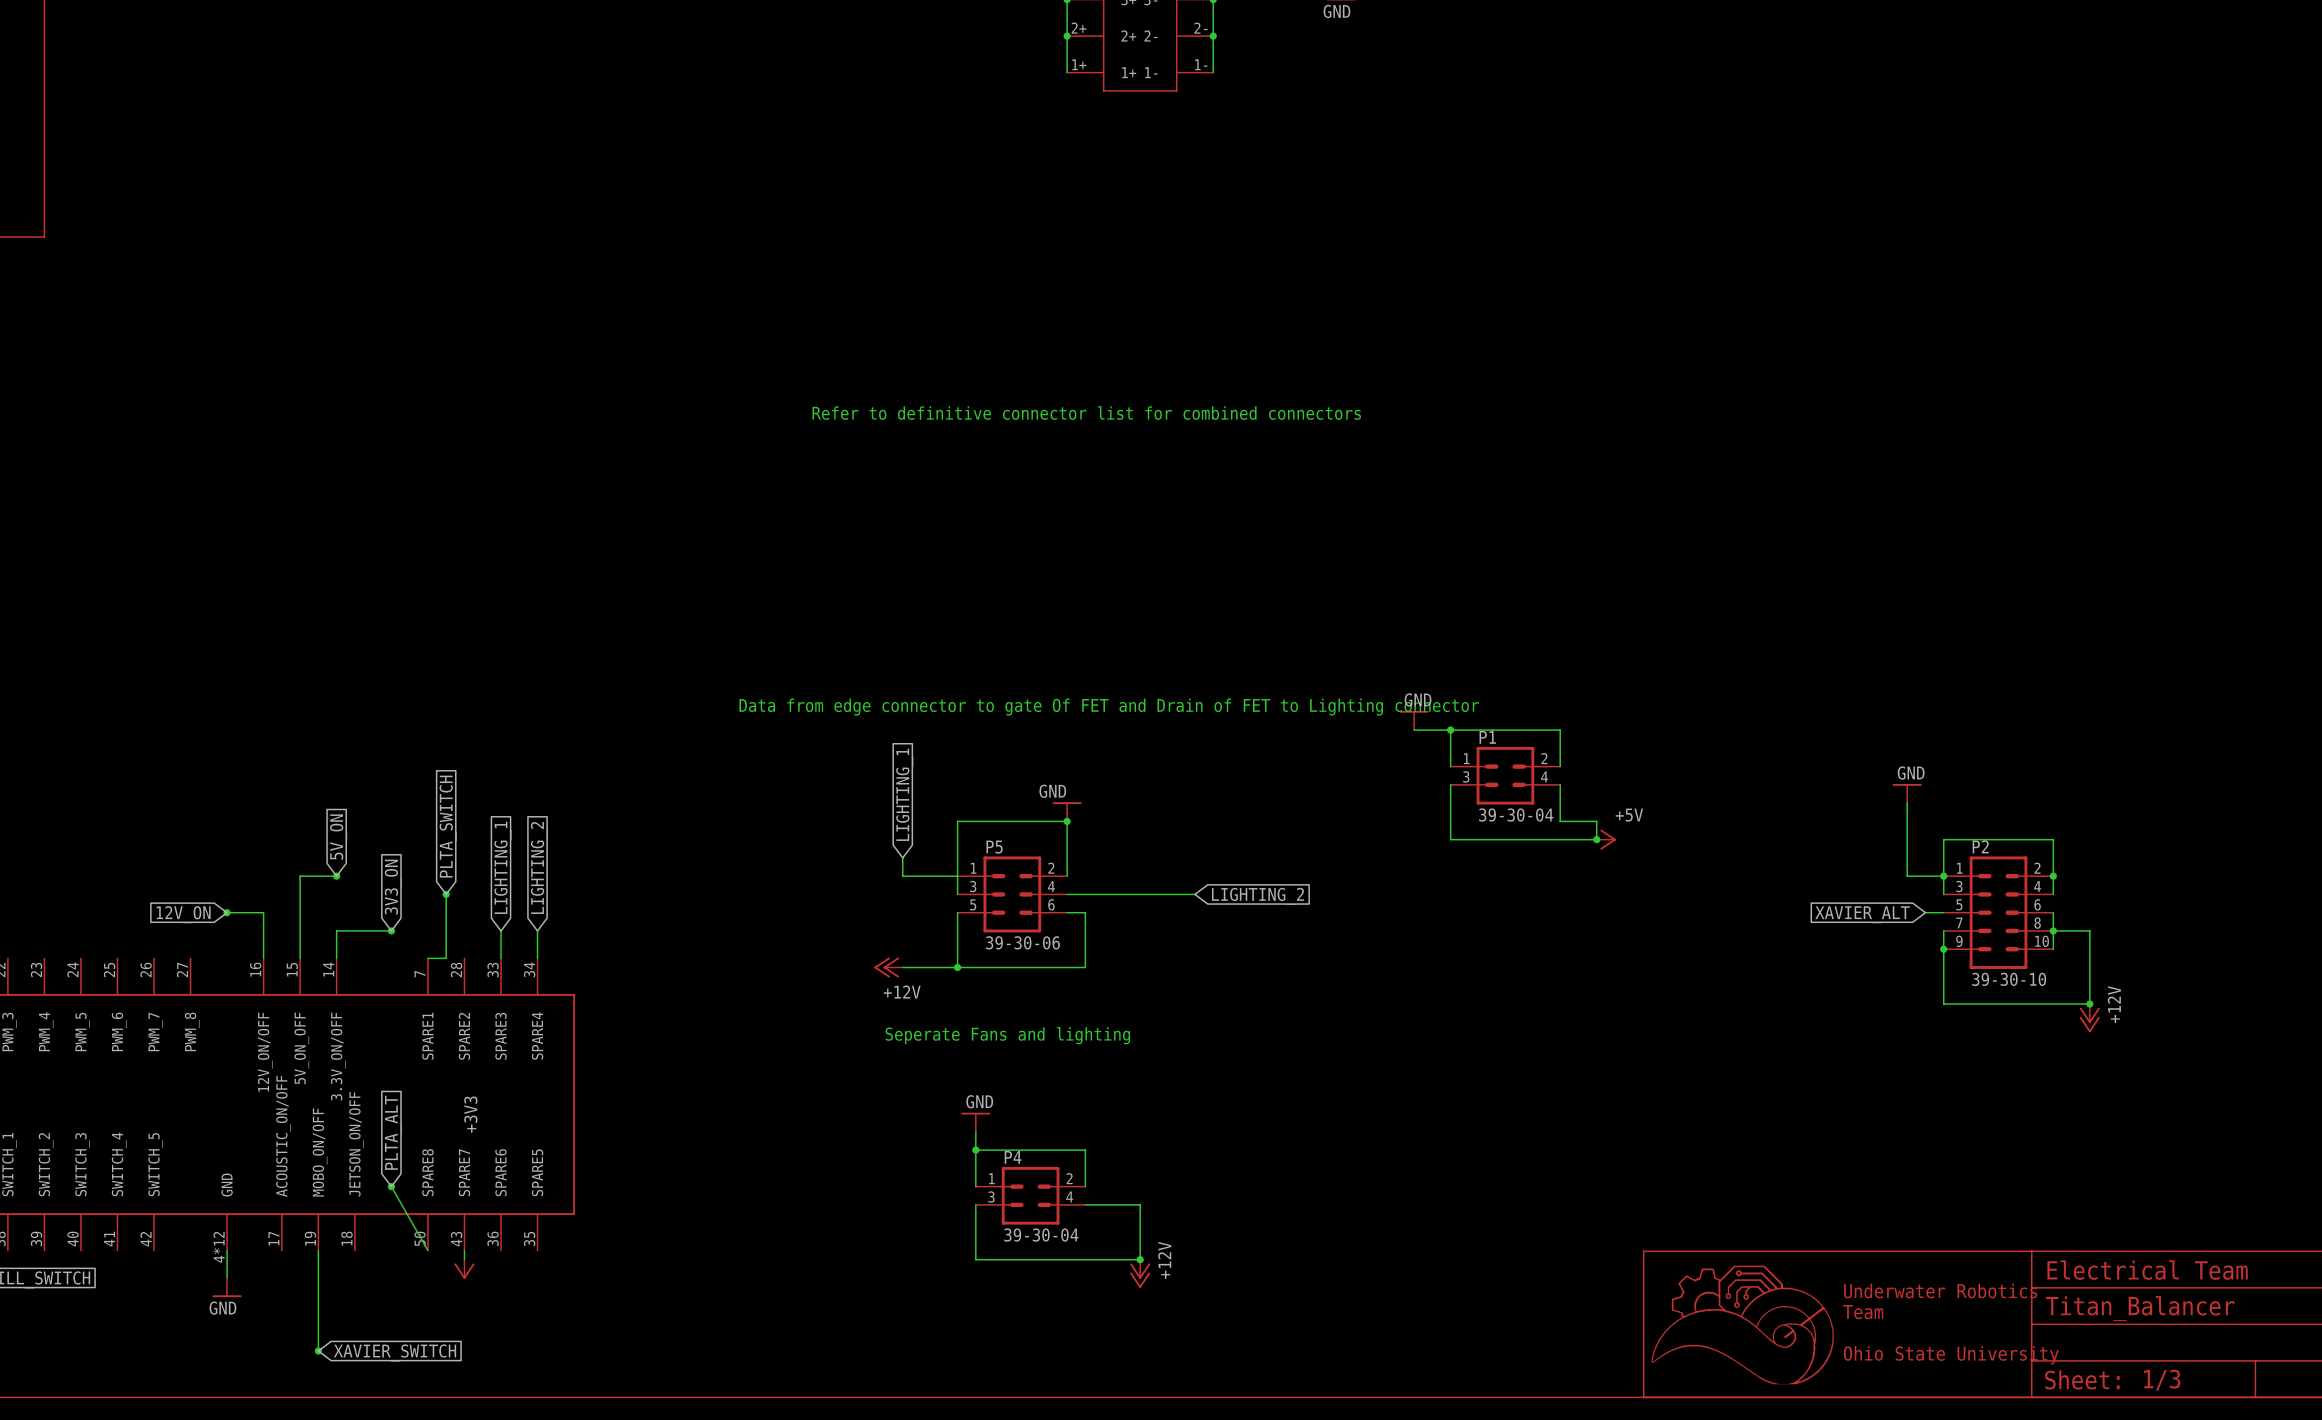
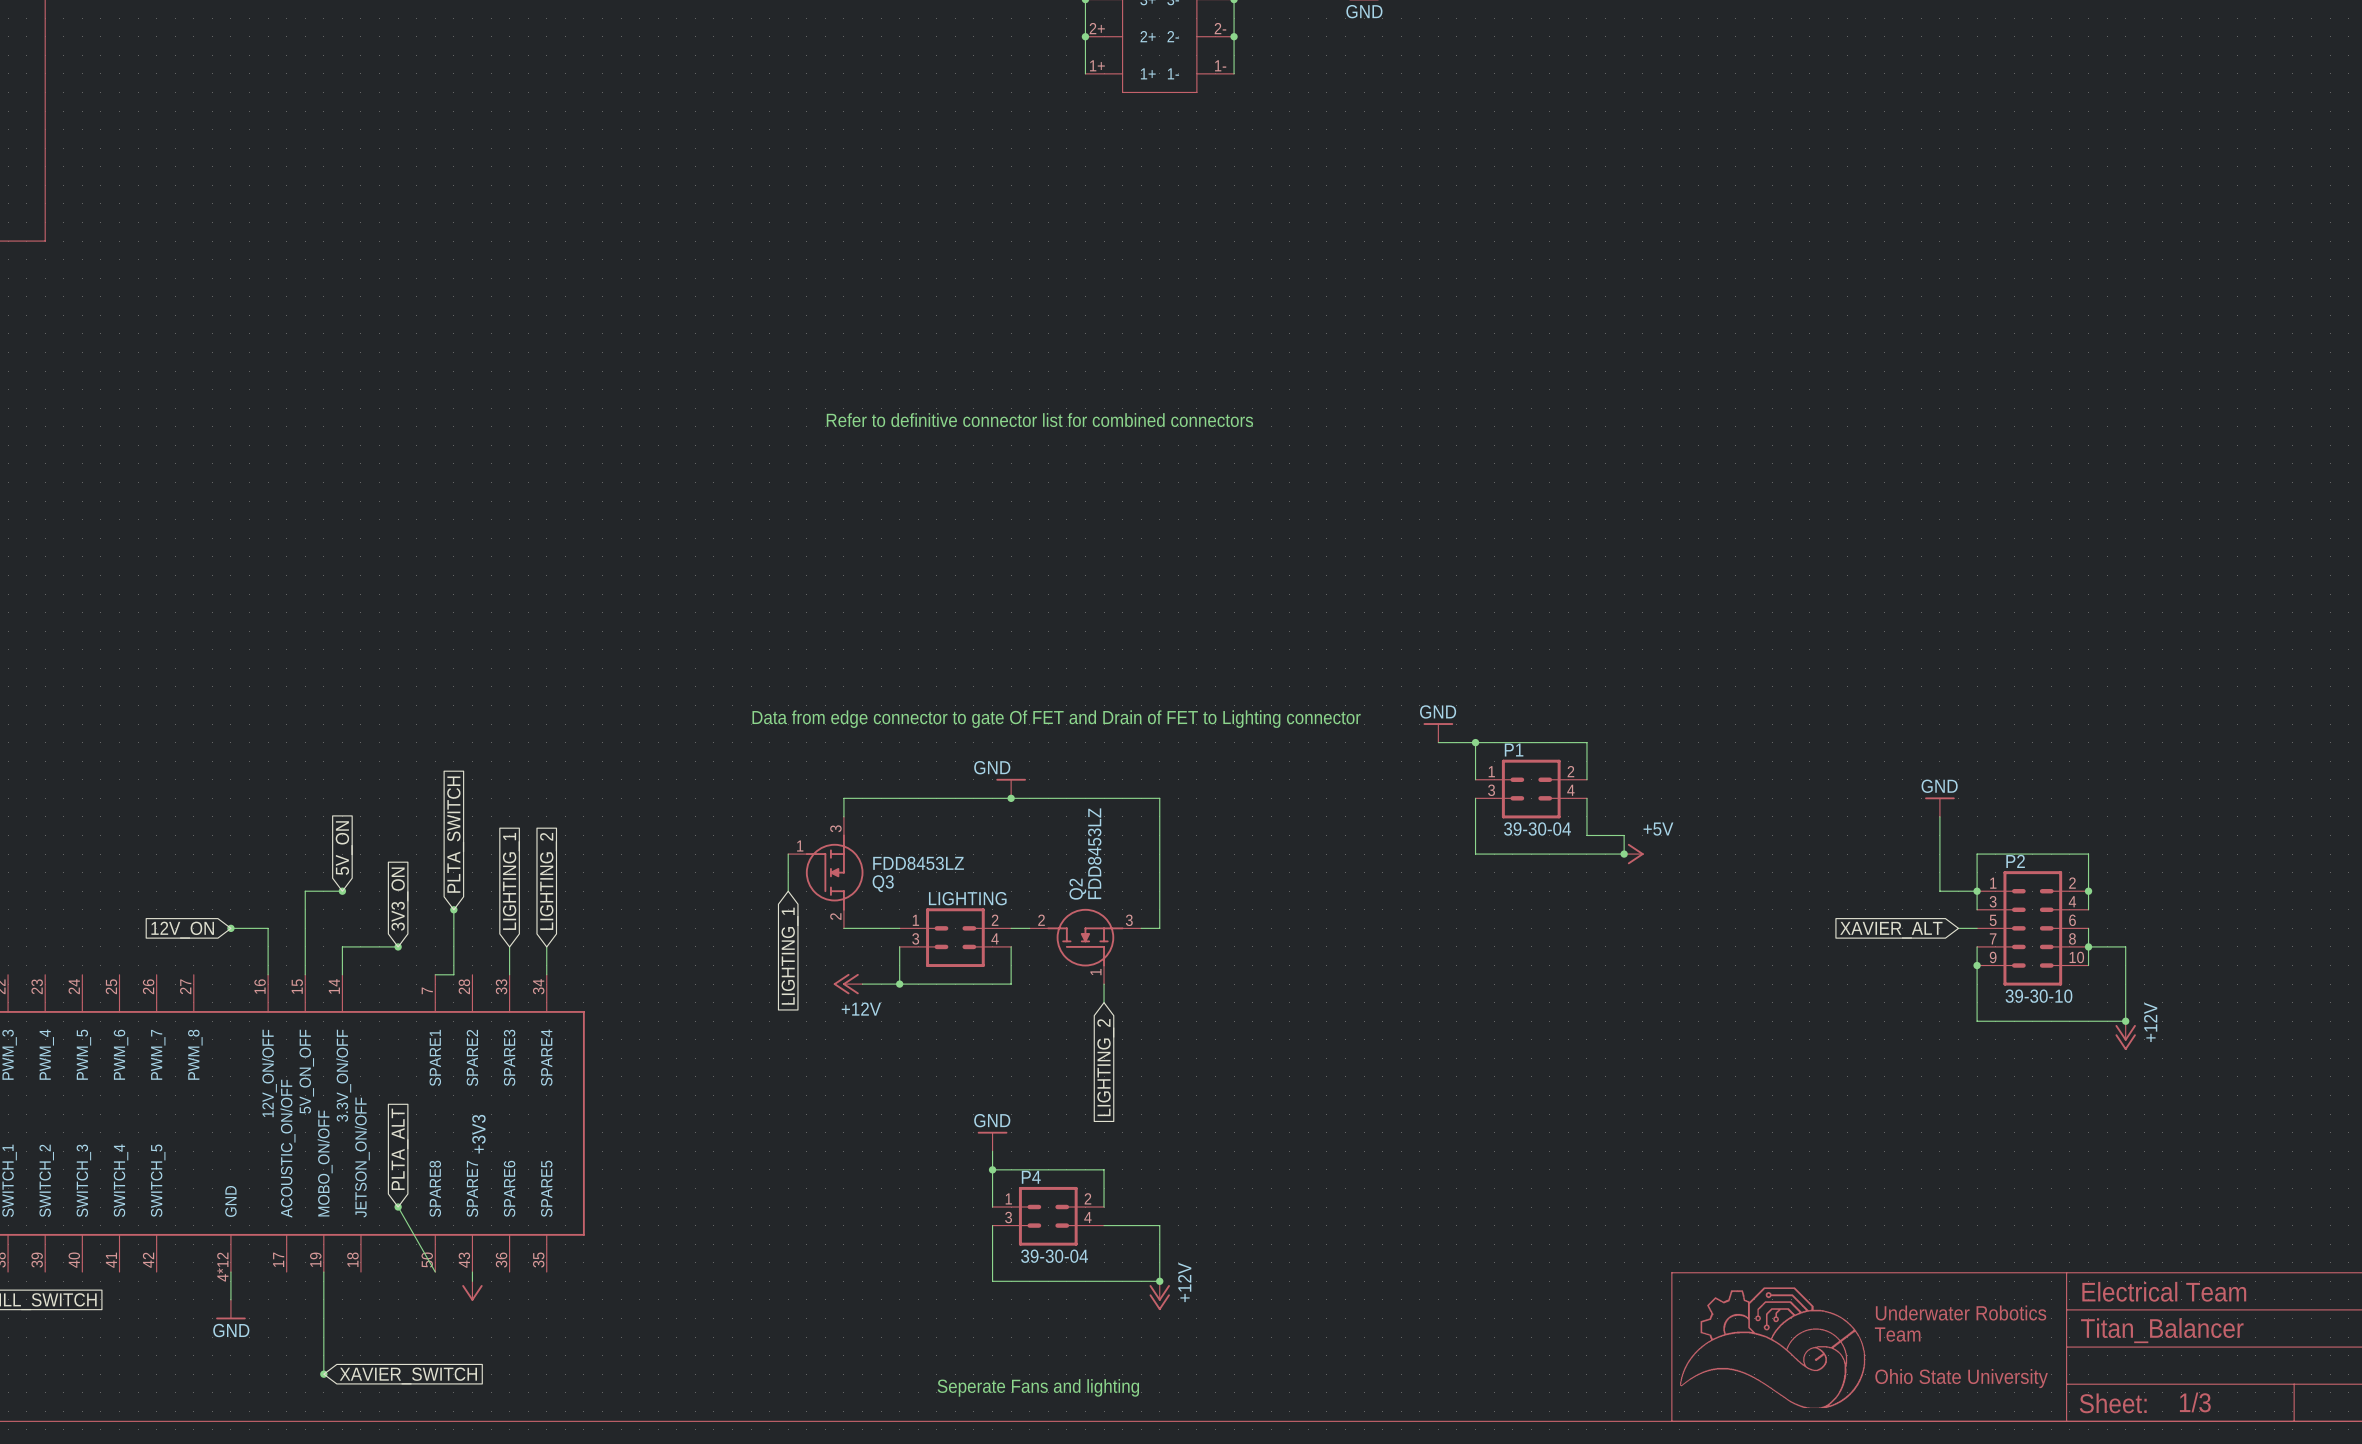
junction: none -> (1011, 798)
global label rotation: 0° (904, 794) -> 180° (790, 956)
global label position: LIGHTING_1 (904, 794) -> LIGHTING_1 (790, 956)
wire: none -> (843, 816) (843, 798) (1159, 798) (1159, 928) (1141, 928)
power symbol position: GND (1067, 811) -> GND (1011, 788)
junction: (1067, 821) -> none
wire: none -> (788, 854) (788, 891)
Q3: none -> FDD8453LZ (825, 872)
wire: (902, 857) (902, 876) (957, 876) -> none
wire: (1067, 876) (1067, 821) (957, 821) (957, 894) -> none
P5: 39-30-06 (1012, 894) -> none
wire: (1067, 894) (1194, 894) -> none
global label rotation: 0° (1257, 896) -> 90° clockwise (1105, 1067)
global label position: LIGHTING_2 (1257, 896) -> LIGHTING_2 (1105, 1067)
wire: none -> (843, 928) (899, 928)
wire: (957, 912) (957, 967) -> none
wire: (1067, 912) (1085, 912) (1085, 967) (994, 967) -> (1011, 946) (1011, 984)
LIGHTING: none -> (955, 937)
wire: none -> (899, 946) (899, 984)
Q2: none -> FDD8453LZ (1085, 946)
wire: none -> (862, 984) (918, 984)
junction: none -> (899, 984)
power symbol position: +12V (888, 967) -> +12V (848, 984)
junction: (957, 967) -> none
wire: none -> (1104, 984) (1104, 1002)
text: Seperate Fans and lighting (1007, 1035) -> none
text: none -> Seperate Fans and lighting (1038, 1387)

